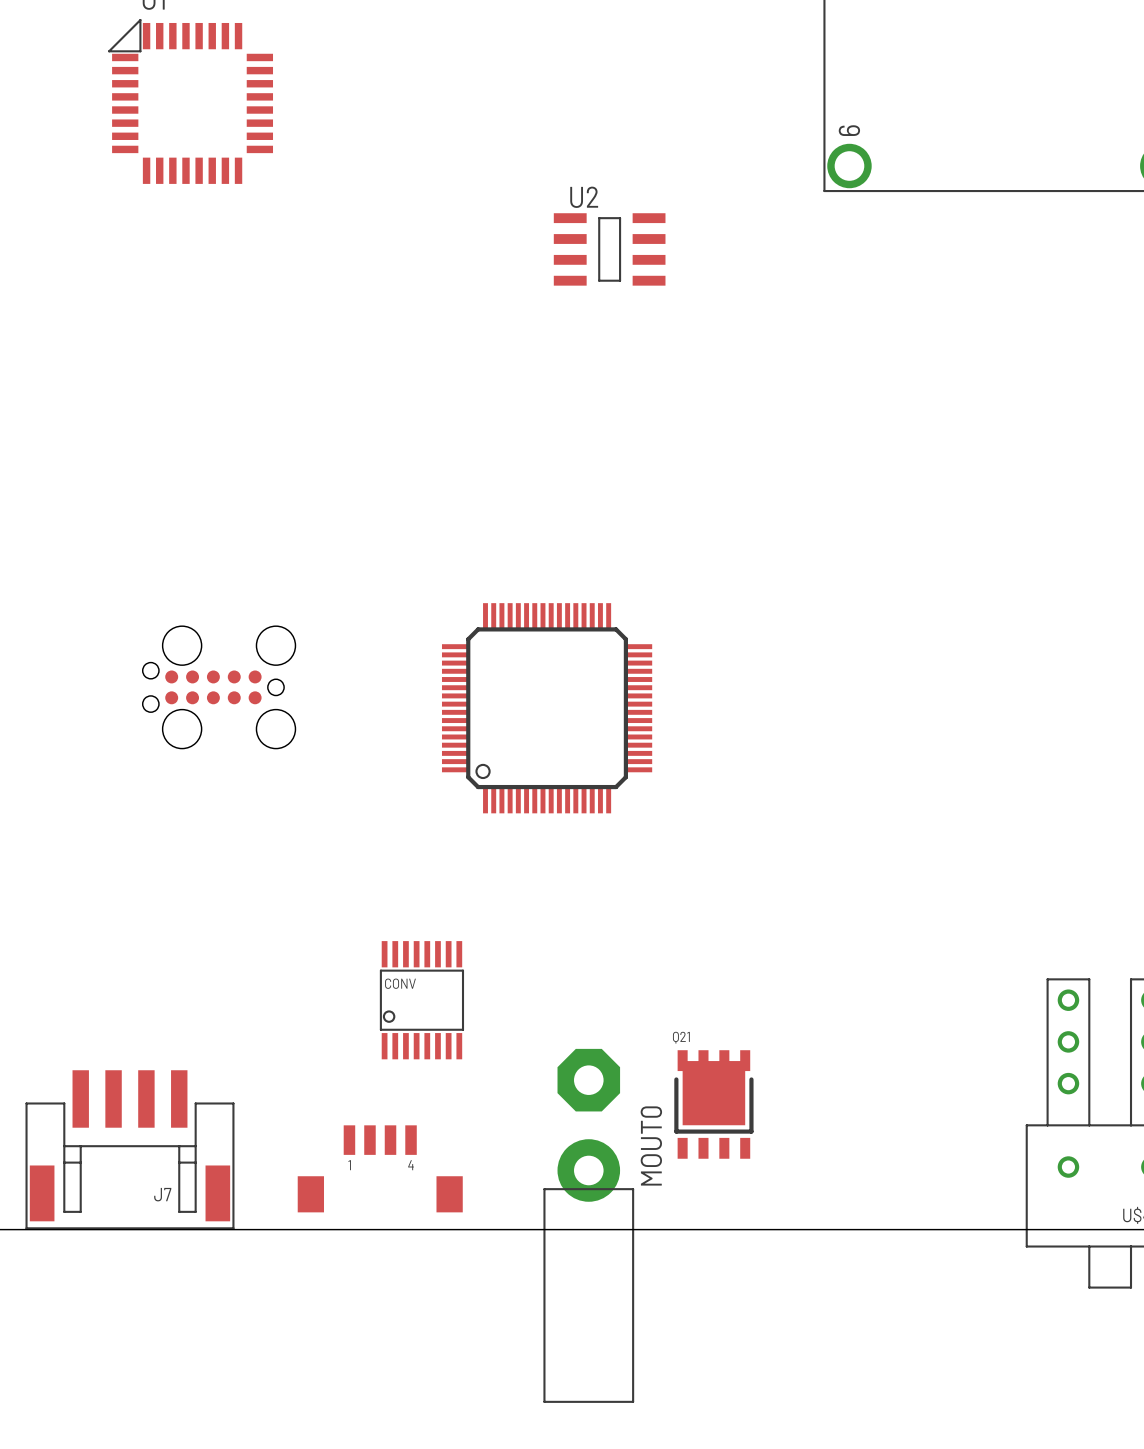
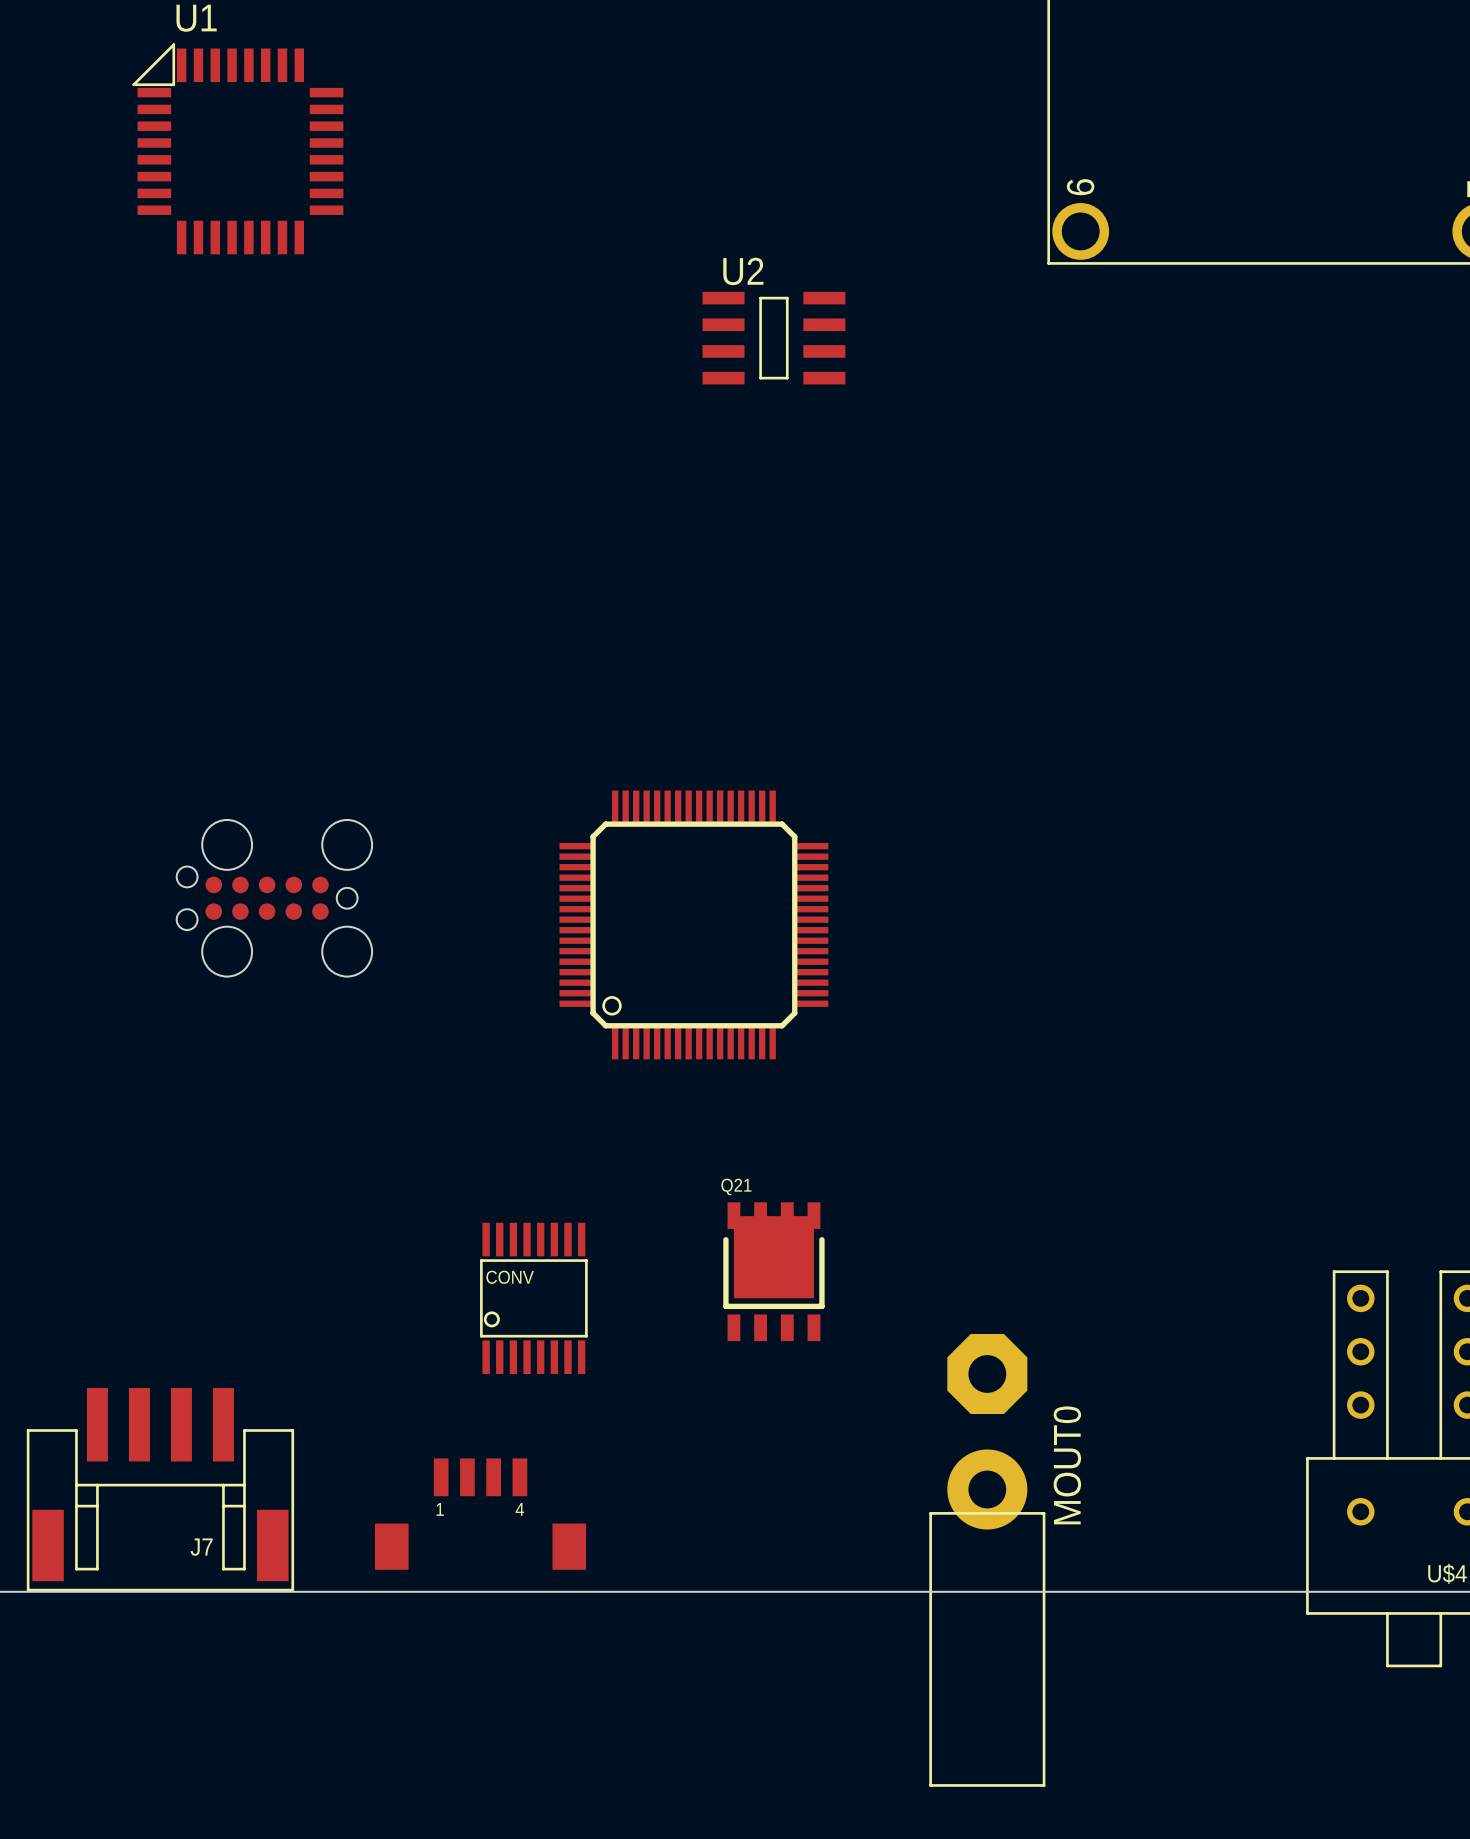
Q21 position: (713, 1104) -> (773, 1271)
MOUT0 position: (588, 1225) -> (987, 1560)

